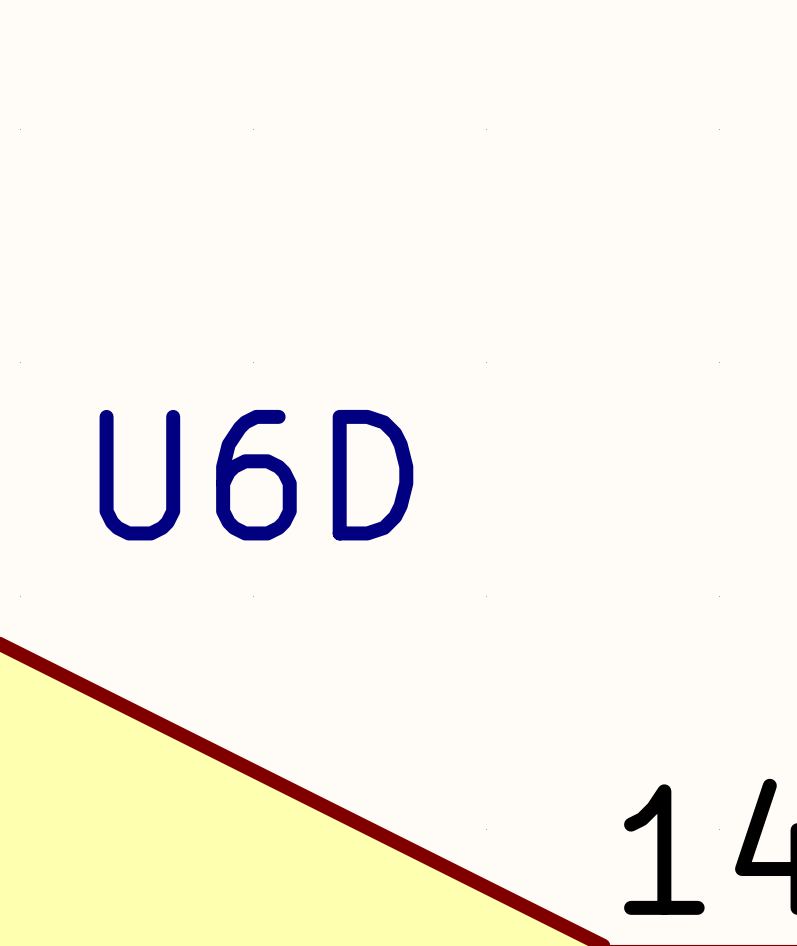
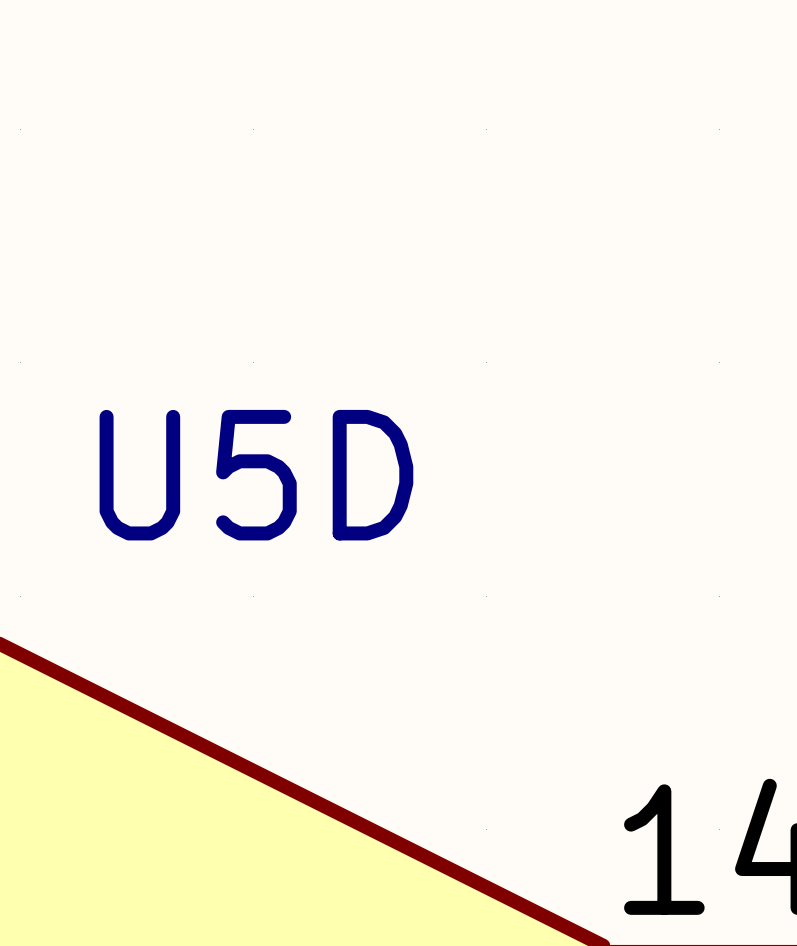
U6D name: U6D (256, 475) -> U5D (256, 475)

